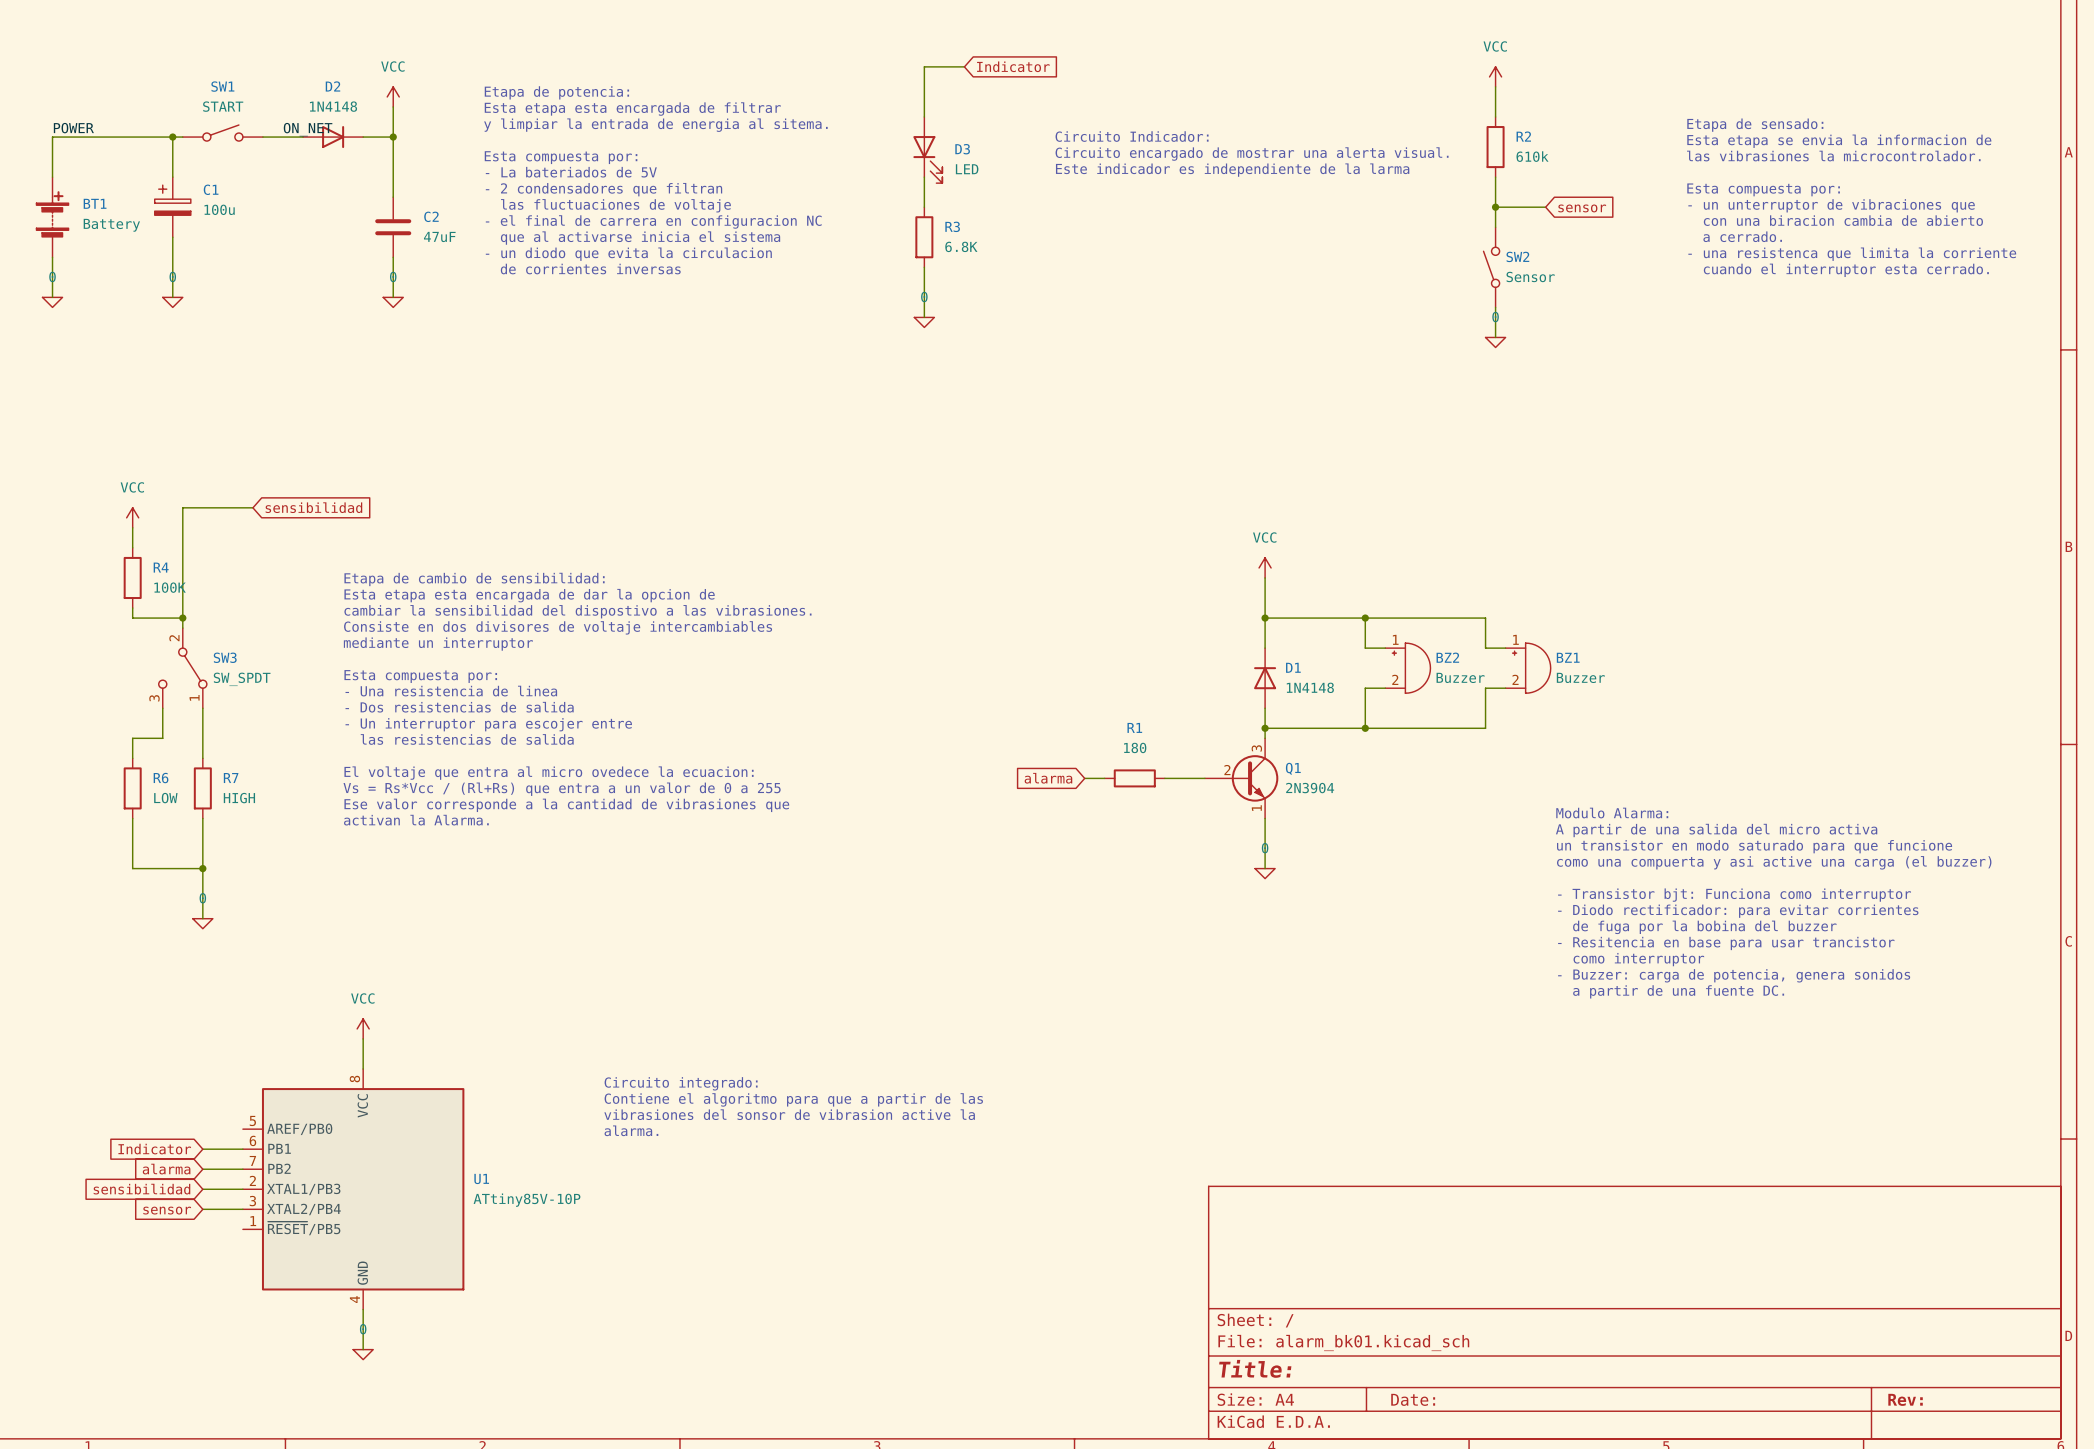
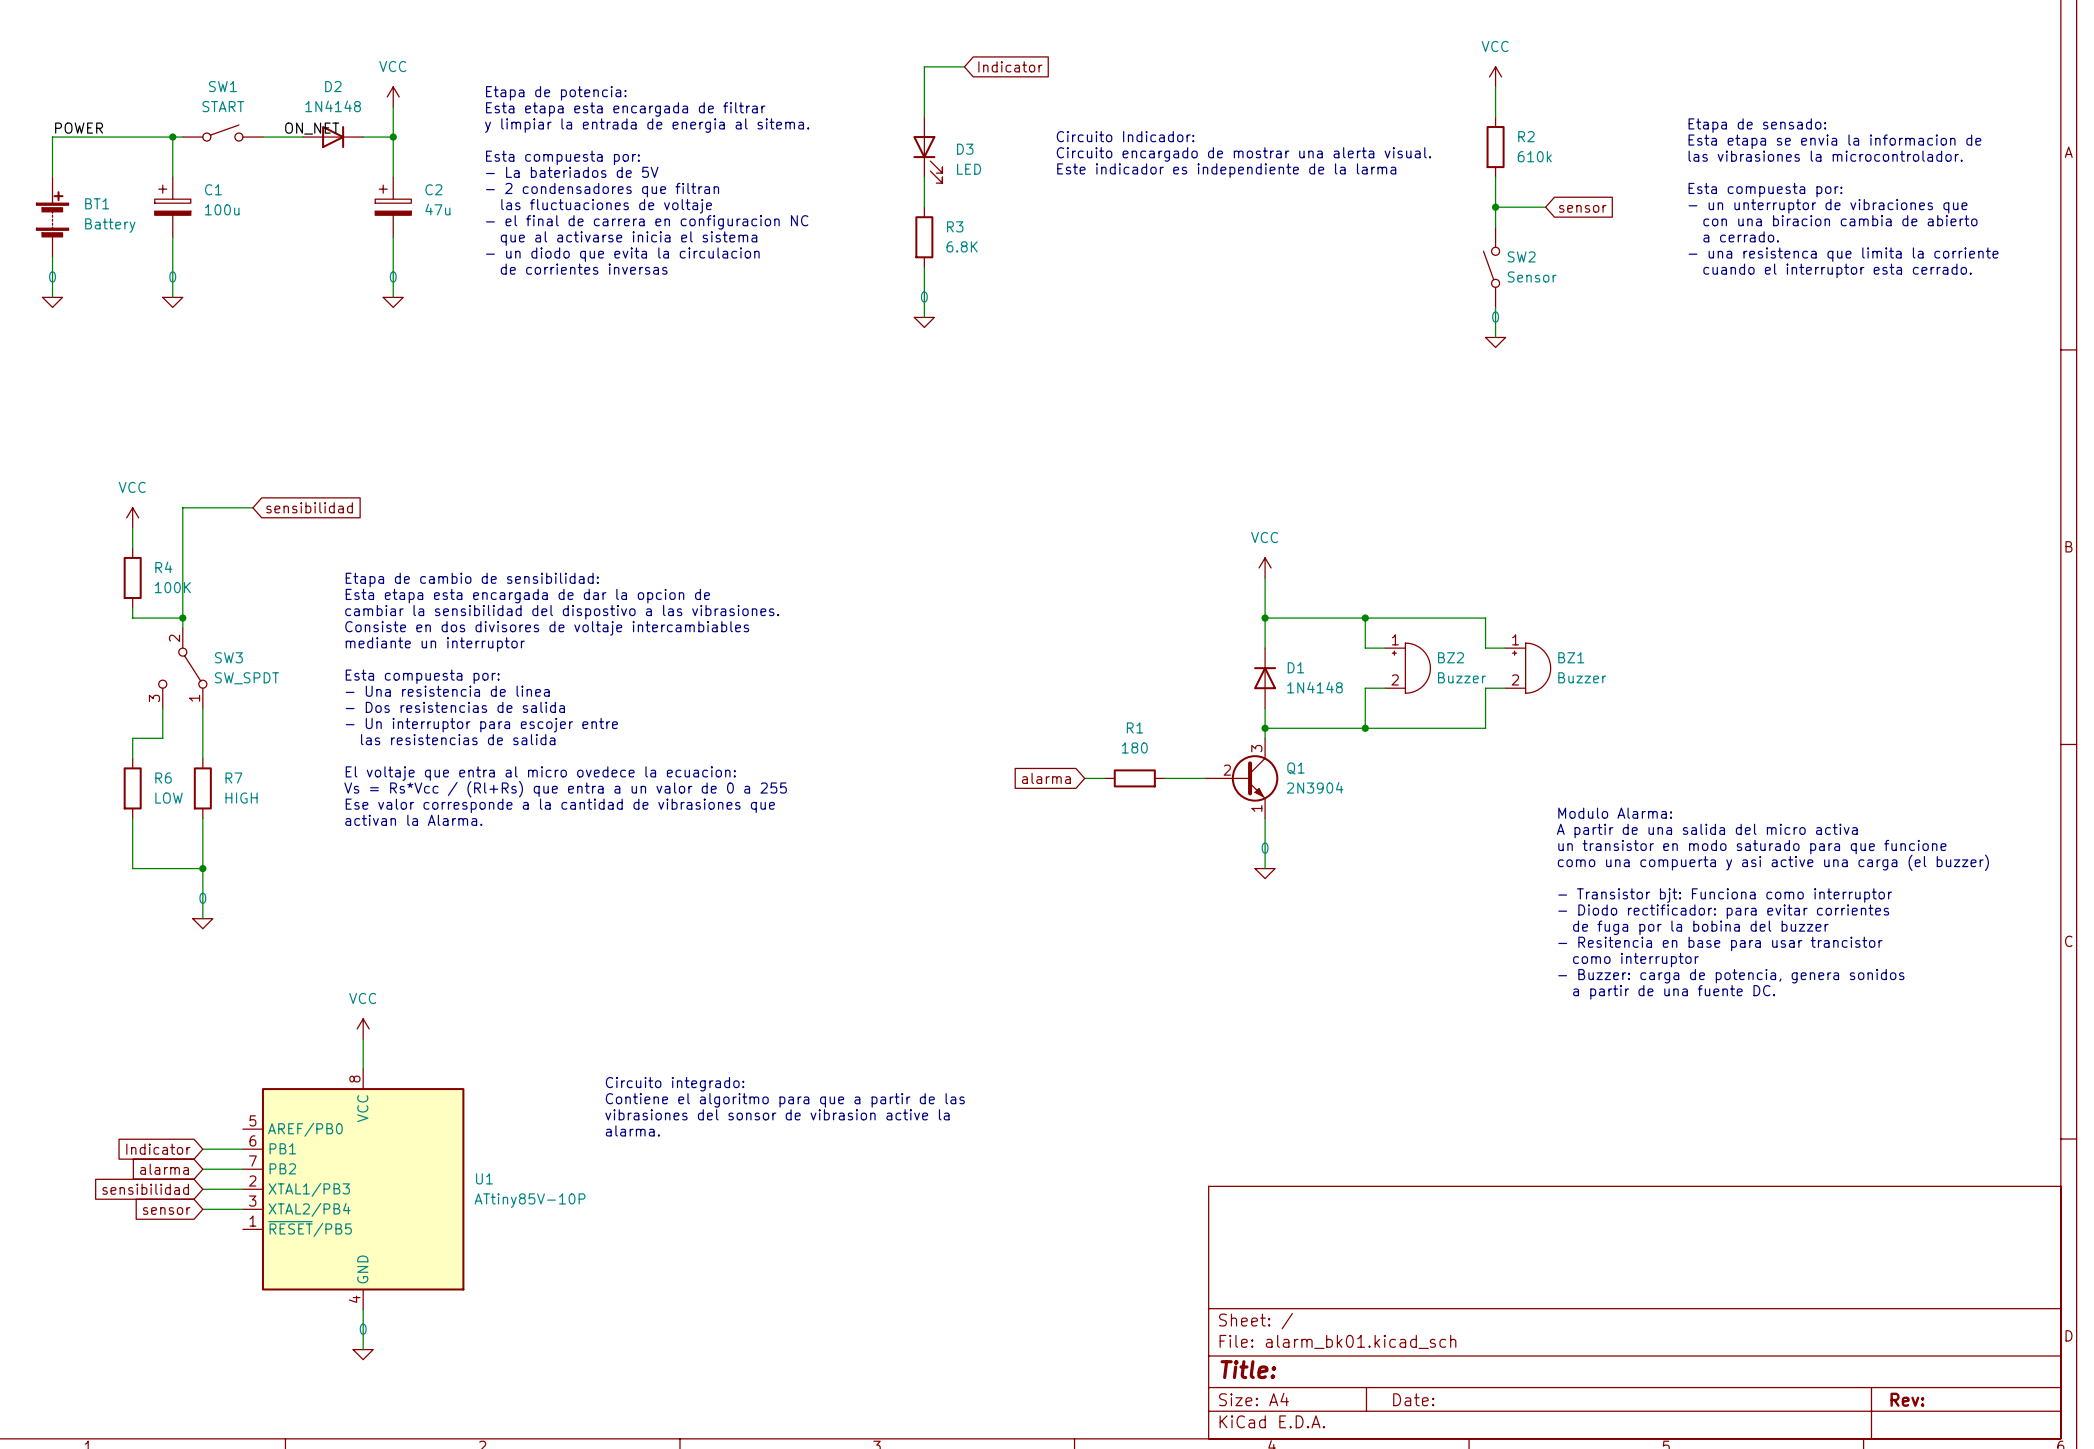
C2 symbol: [375, 197, 412, 258] -> [375, 177, 412, 238]
C2 value: 47uF (439, 236) -> 47u (437, 209)

